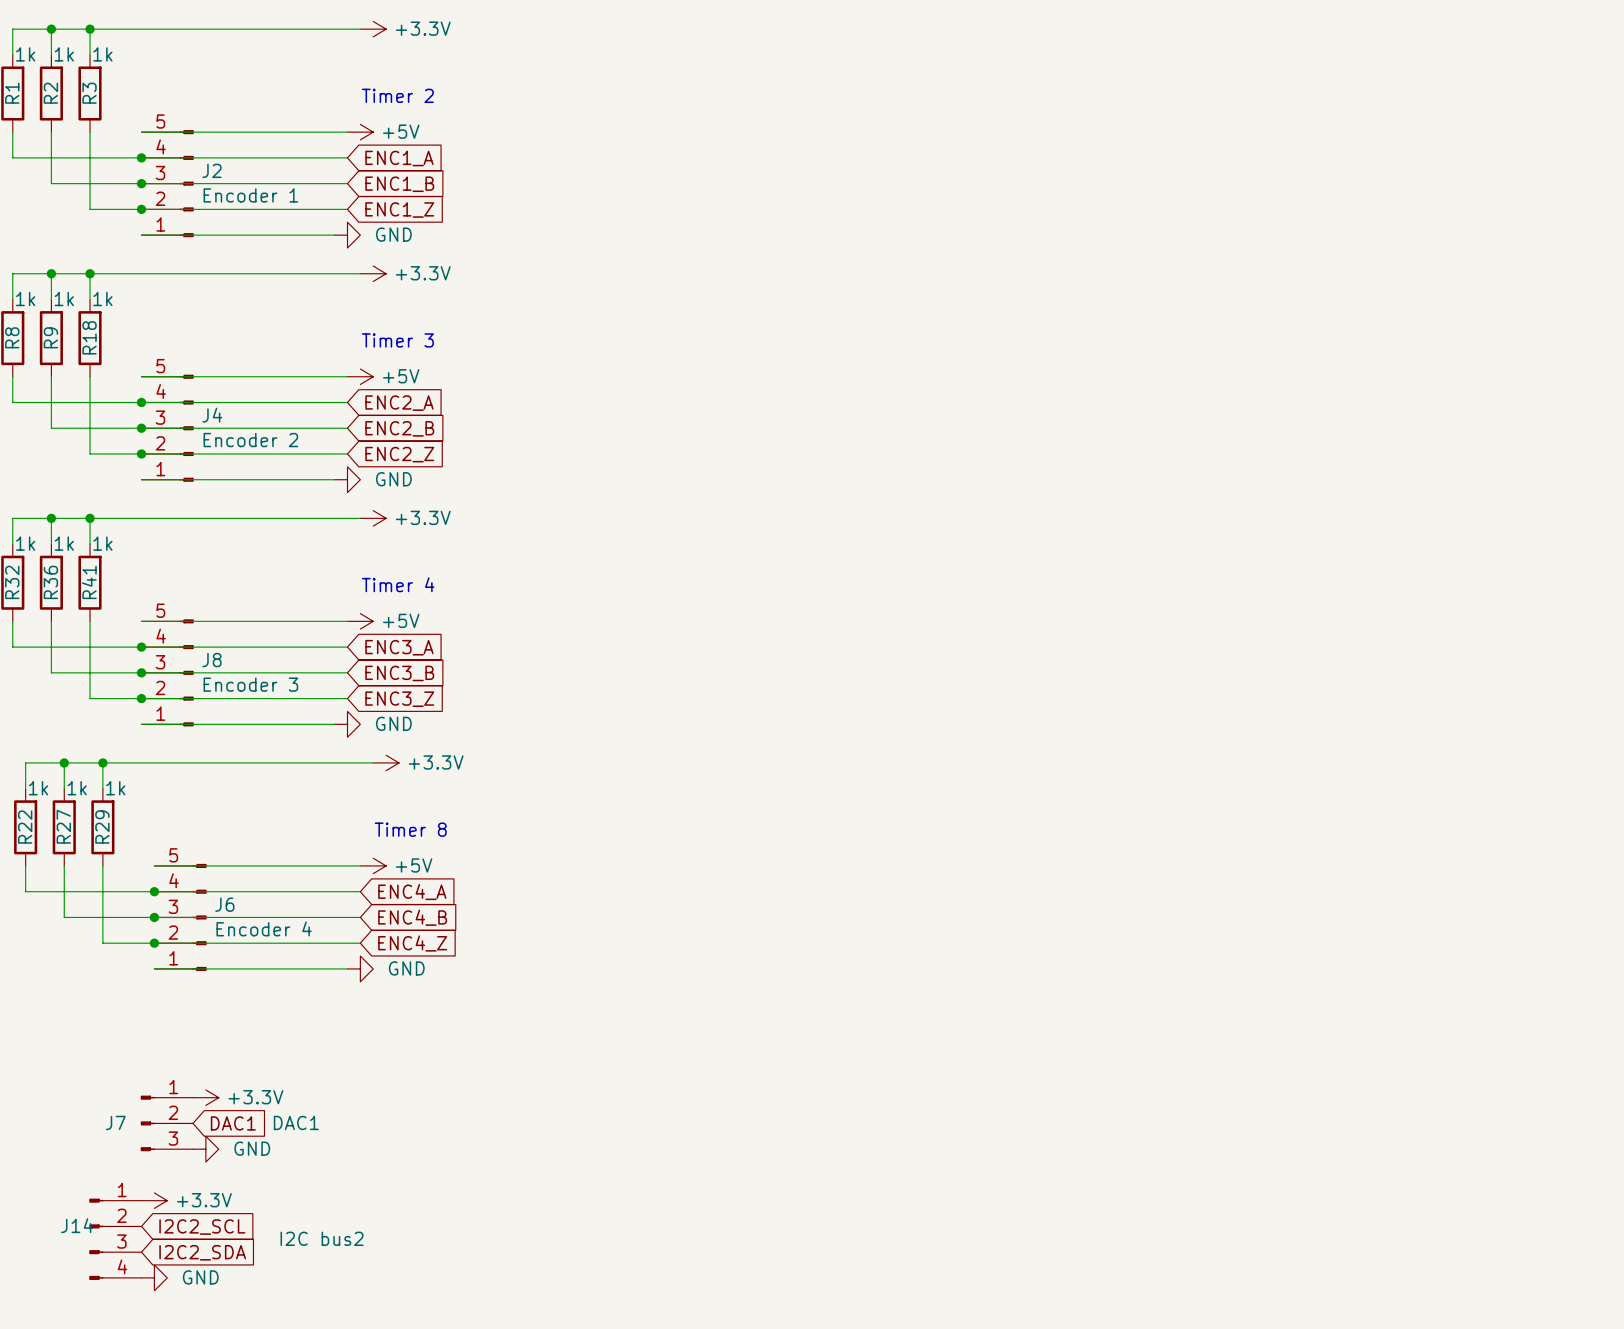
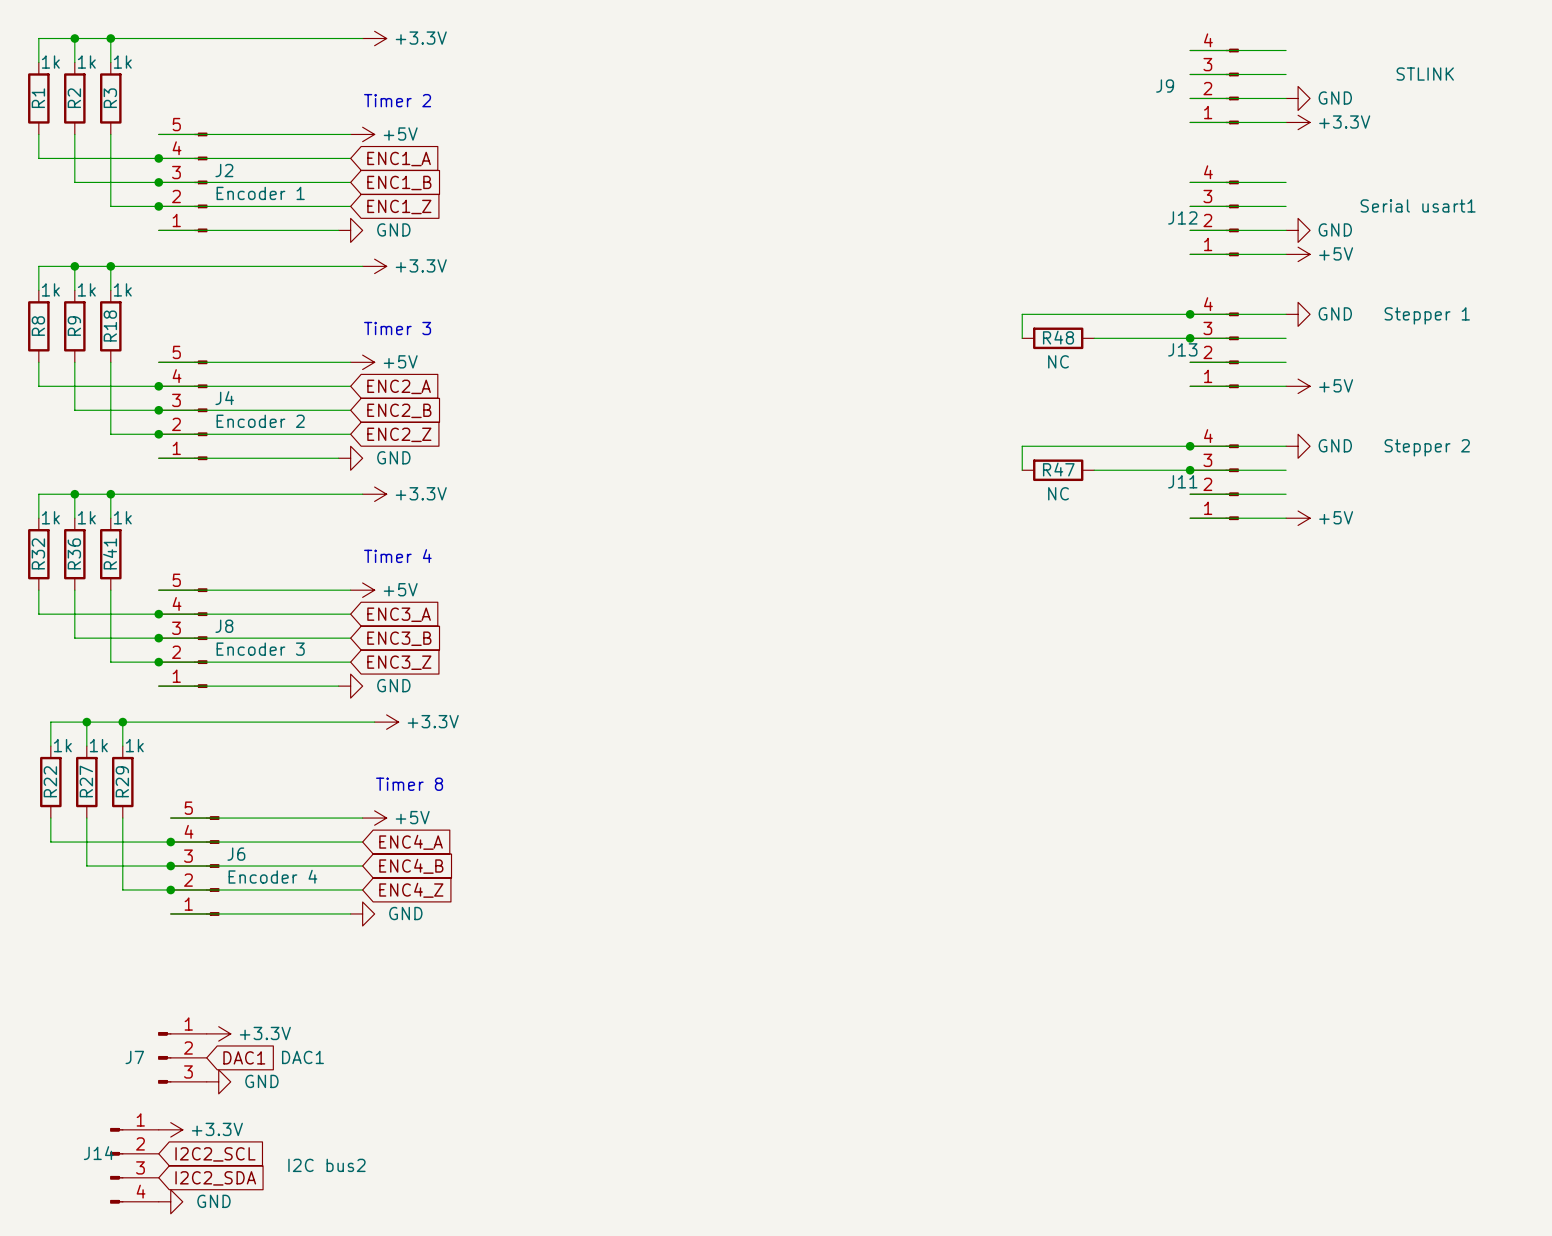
wire: none -> (1190, 50) (1286, 50)
wire: none -> (1190, 74) (1286, 74)
J9: none -> STLINK (1214, 86)
wire: none -> (1190, 98) (1286, 98)
power symbol: none -> GND (1298, 98)
wire: none -> (1190, 122) (1286, 122)
power symbol: none -> +3.3V (1298, 122)
wire: none -> (1190, 182) (1286, 182)
wire: none -> (1190, 206) (1286, 206)
J12: none -> Serial usart1 (1214, 218)
wire: none -> (1190, 230) (1286, 230)
power symbol: none -> GND (1298, 230)
wire: none -> (1190, 254) (1286, 254)
power symbol: none -> +5V (1298, 254)
junction: none -> (1190, 314)
wire: none -> (1286, 314) (1022, 314) (1022, 338)
power symbol: none -> GND (1298, 314)
R48: none -> NC (1058, 338)
wire: none -> (1094, 338) (1286, 338)
junction: none -> (1190, 338)
J13: none -> Stepper 1 (1214, 350)
wire: none -> (1190, 362) (1286, 362)
wire: none -> (1190, 386) (1286, 386)
power symbol: none -> +5V (1298, 386)
junction: none -> (1190, 446)
wire: none -> (1286, 446) (1022, 446) (1022, 470)
power symbol: none -> GND (1298, 446)
R47: none -> NC (1058, 470)
wire: none -> (1094, 470) (1286, 470)
junction: none -> (1190, 470)
J11: none -> Stepper 2 (1214, 482)
wire: none -> (1190, 494) (1286, 494)
wire: none -> (1190, 518) (1286, 518)
power symbol: none -> +5V (1298, 518)

